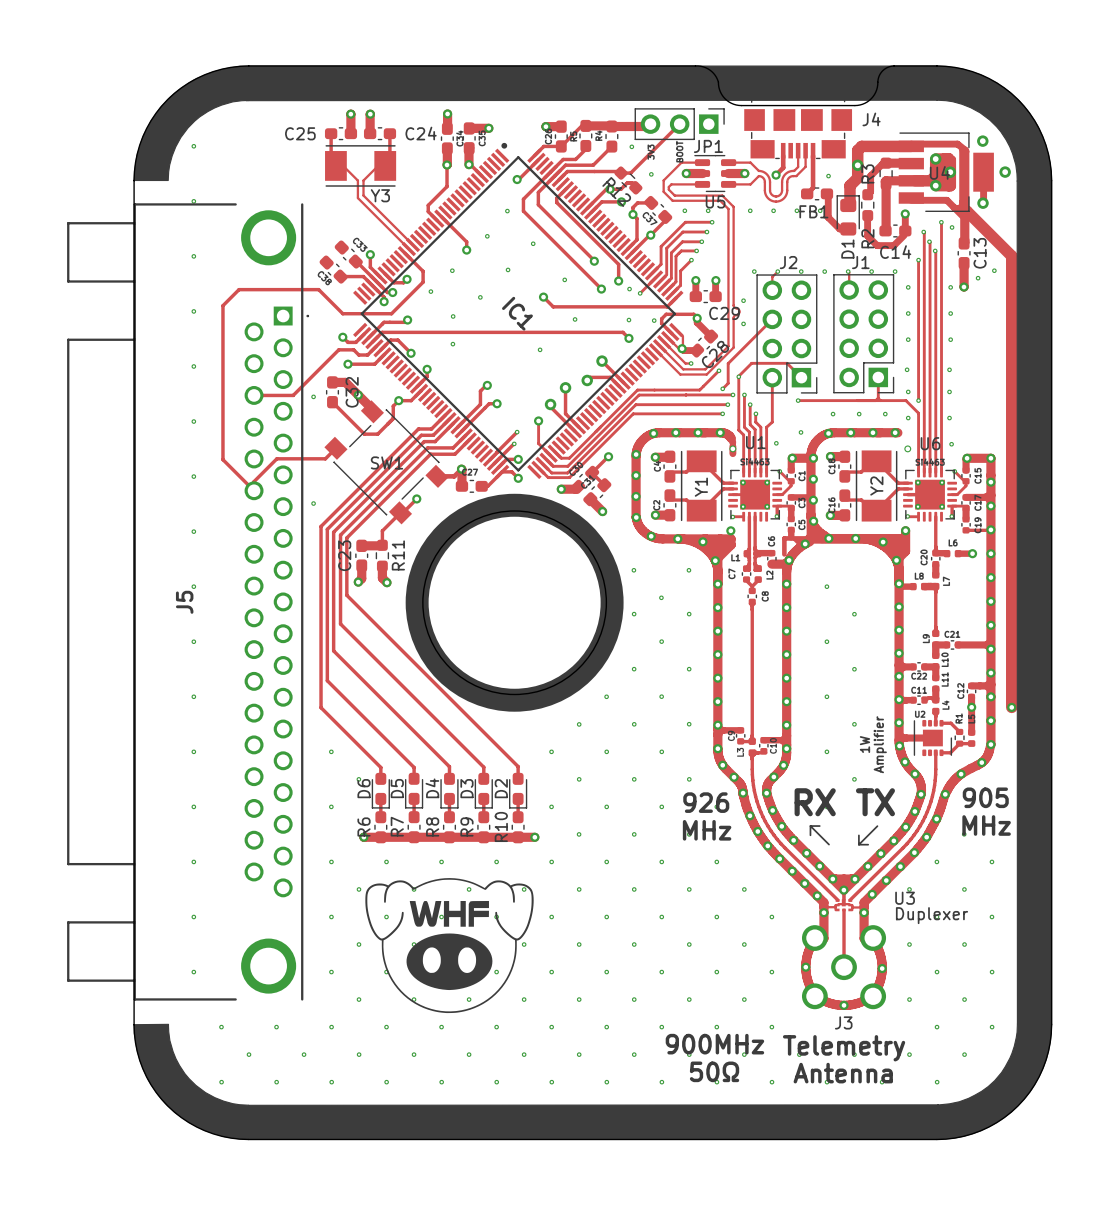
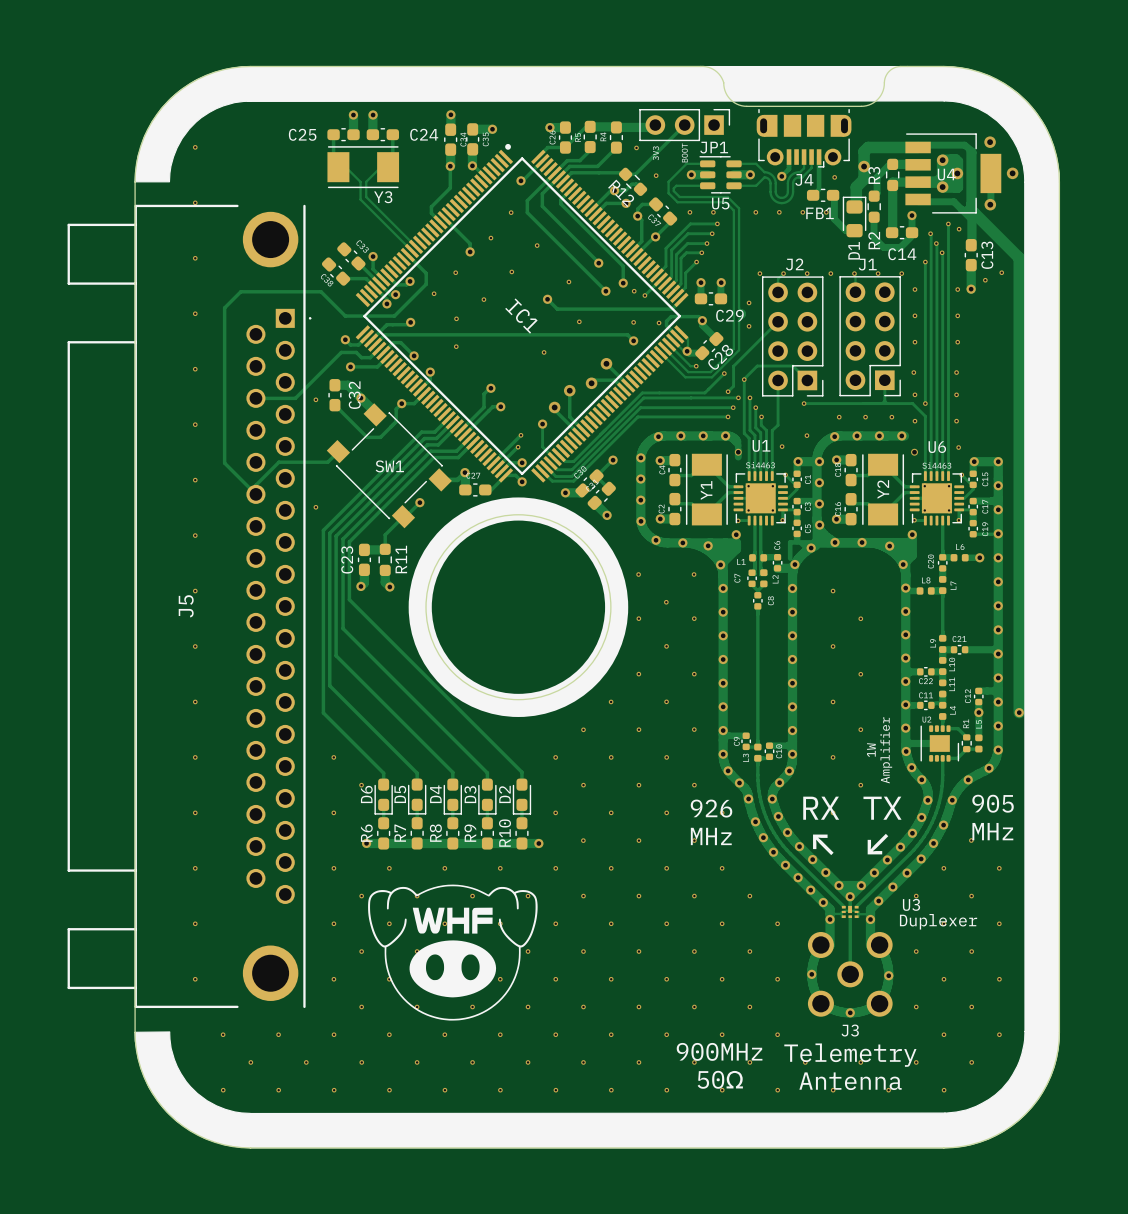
J4 footprint: [744, 91, 853, 160] -> [756, 108, 852, 168]
J4 name position: J4 (871, 119) -> J4 (804, 179)

